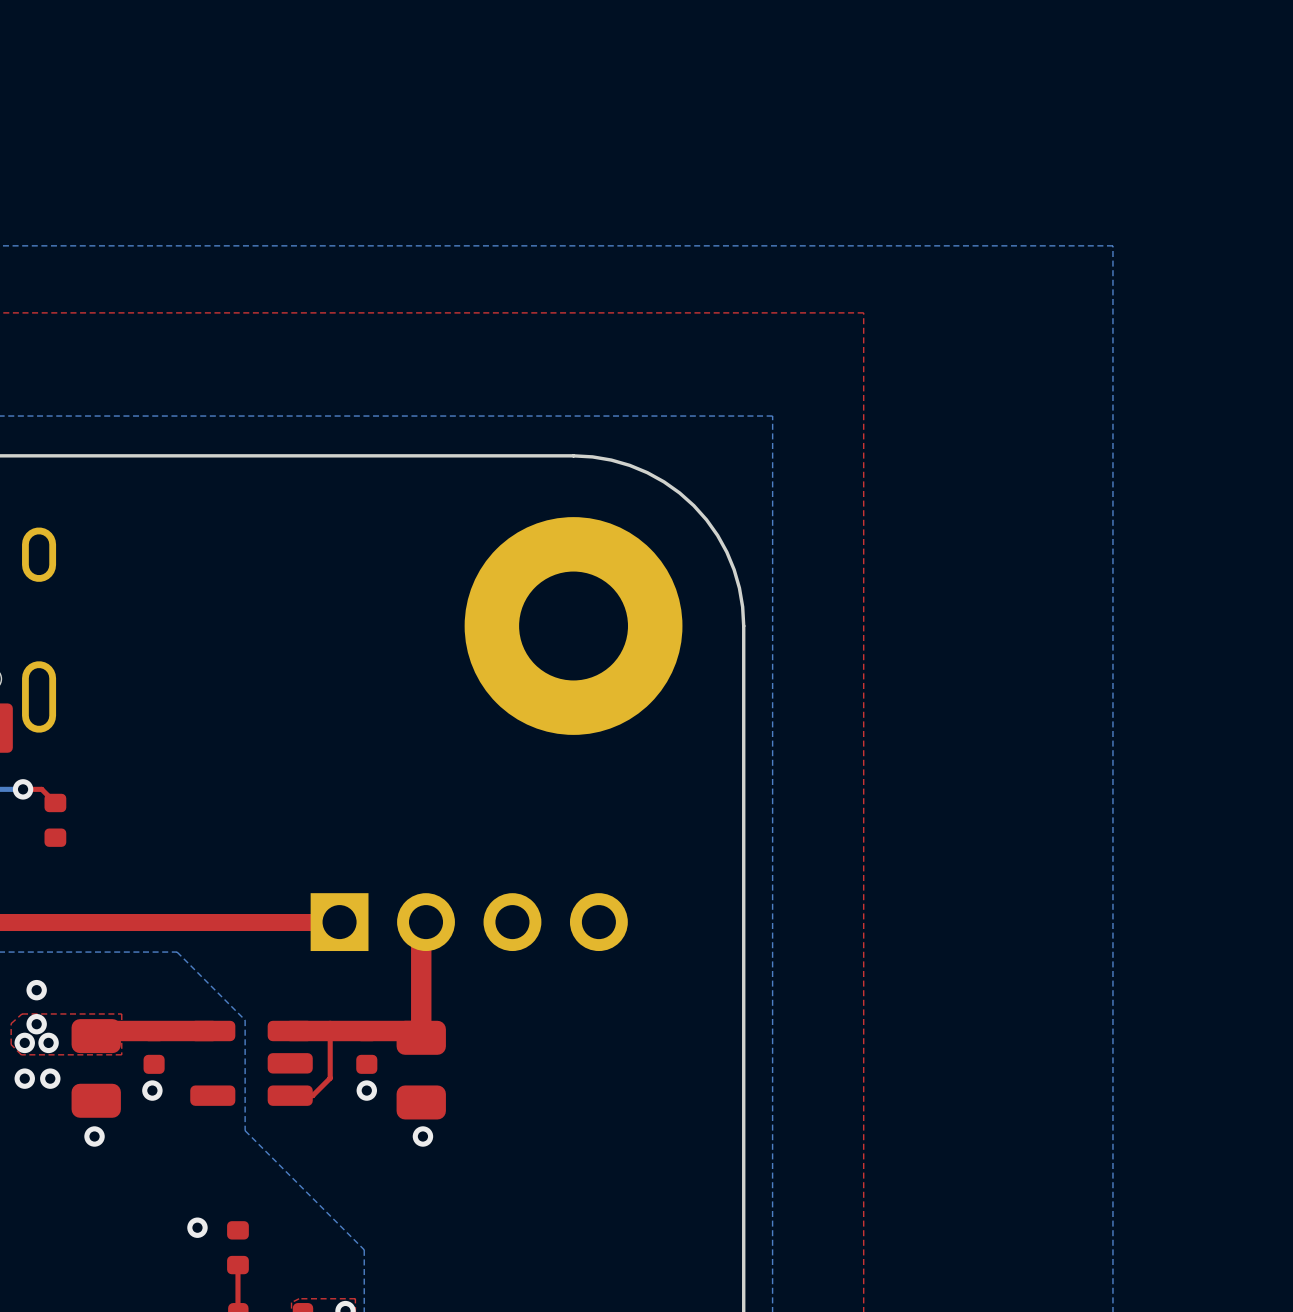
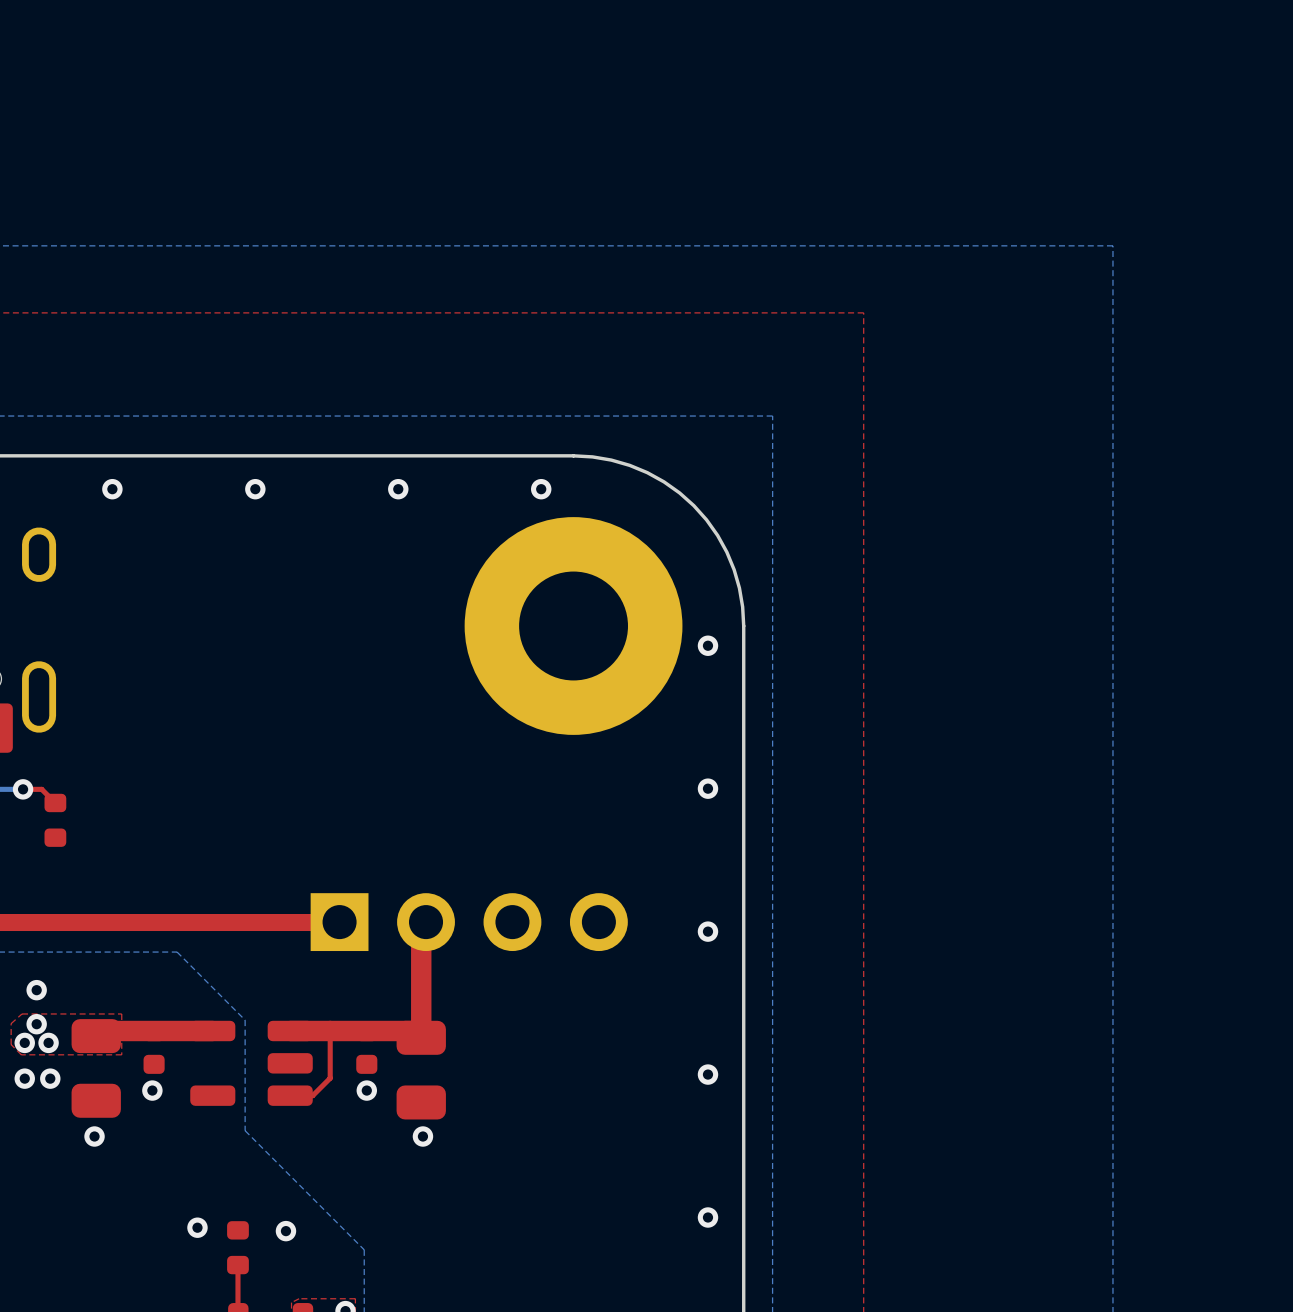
via: none -> (112, 489)
via: none -> (255, 489)
via: none -> (398, 489)
via: none -> (541, 489)
via: none -> (707, 645)
via: none -> (707, 788)
via: none -> (707, 931)
via: none -> (707, 1074)
via: none -> (707, 1217)
via: none -> (285, 1231)

